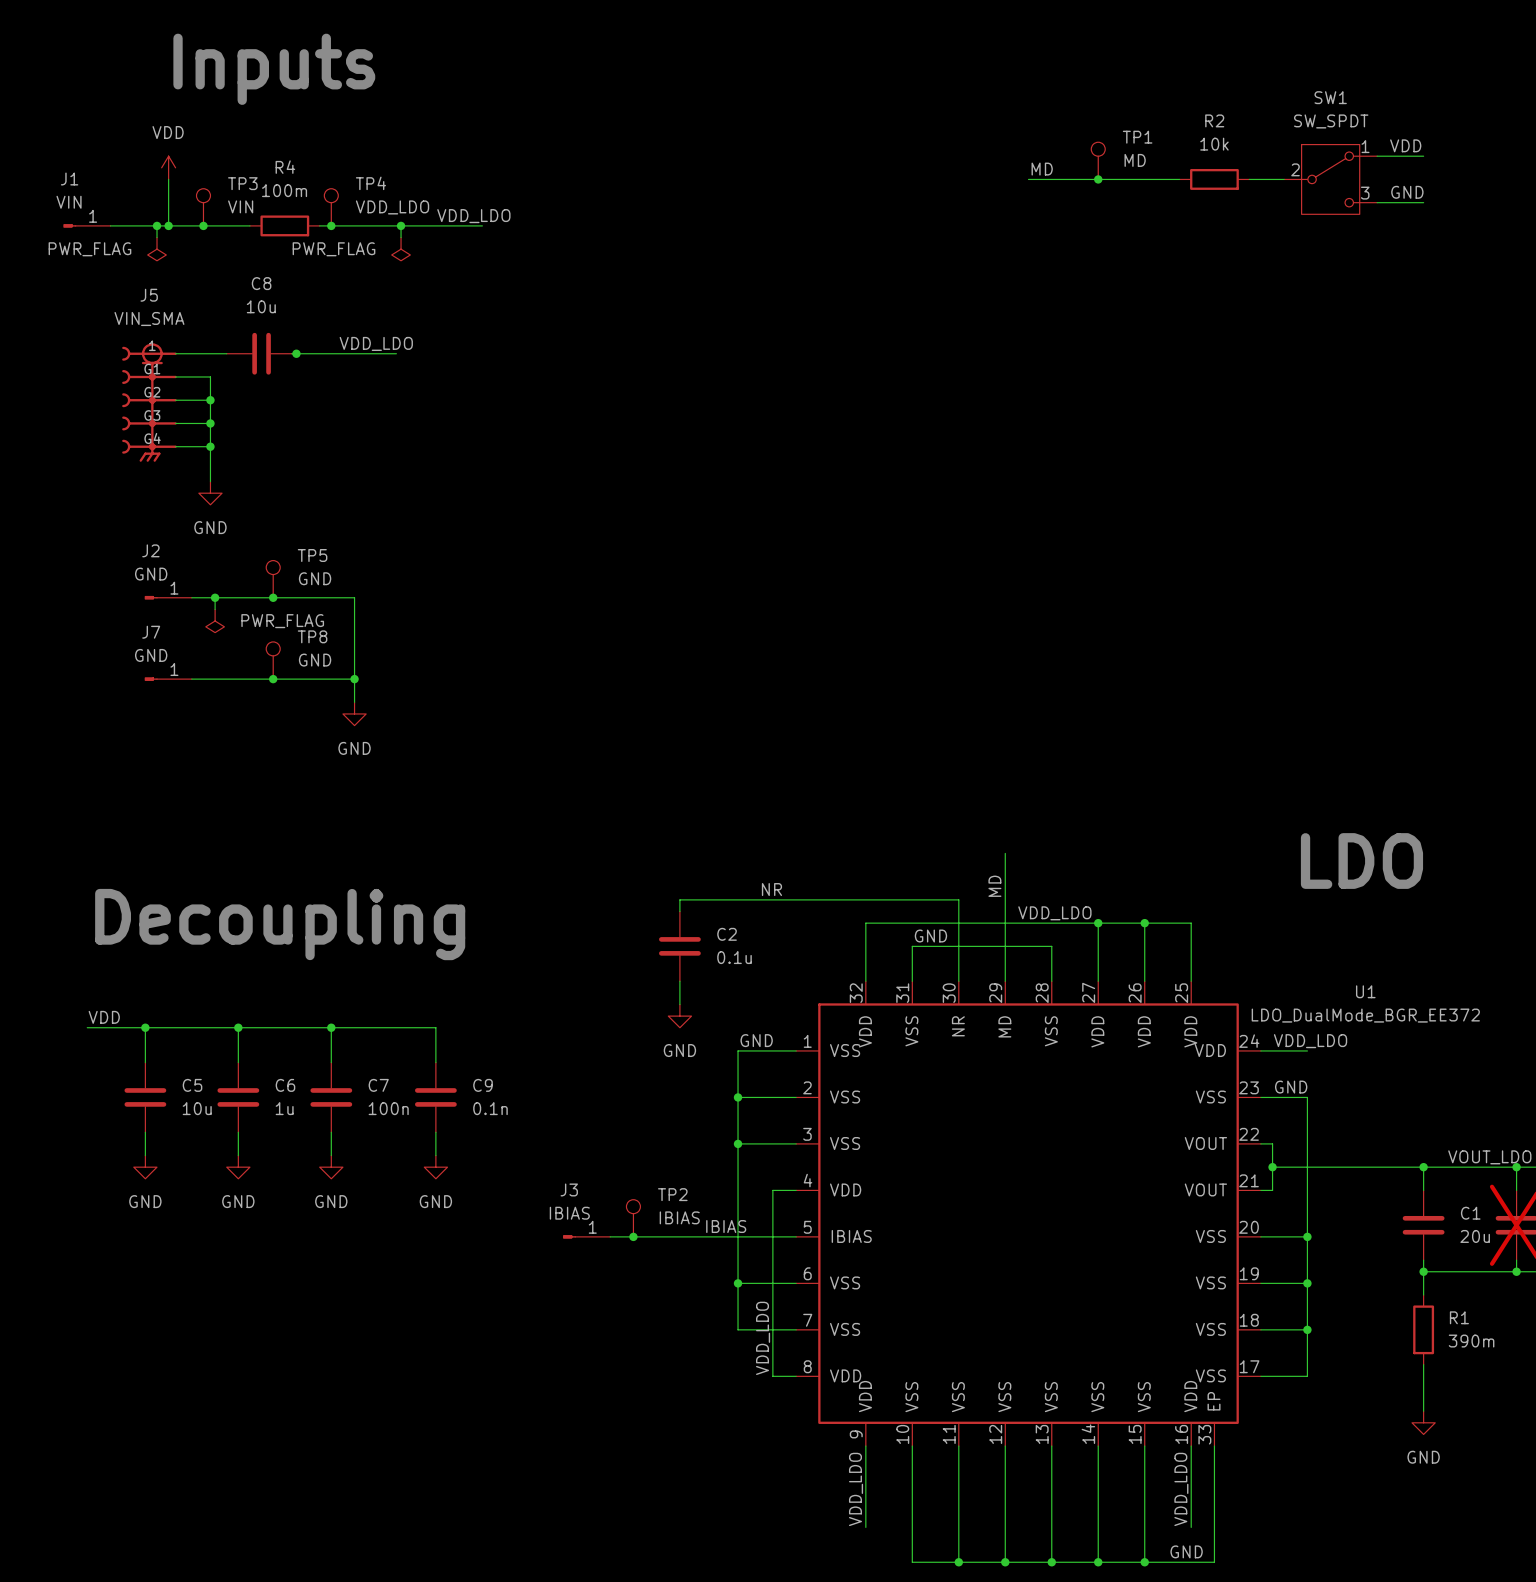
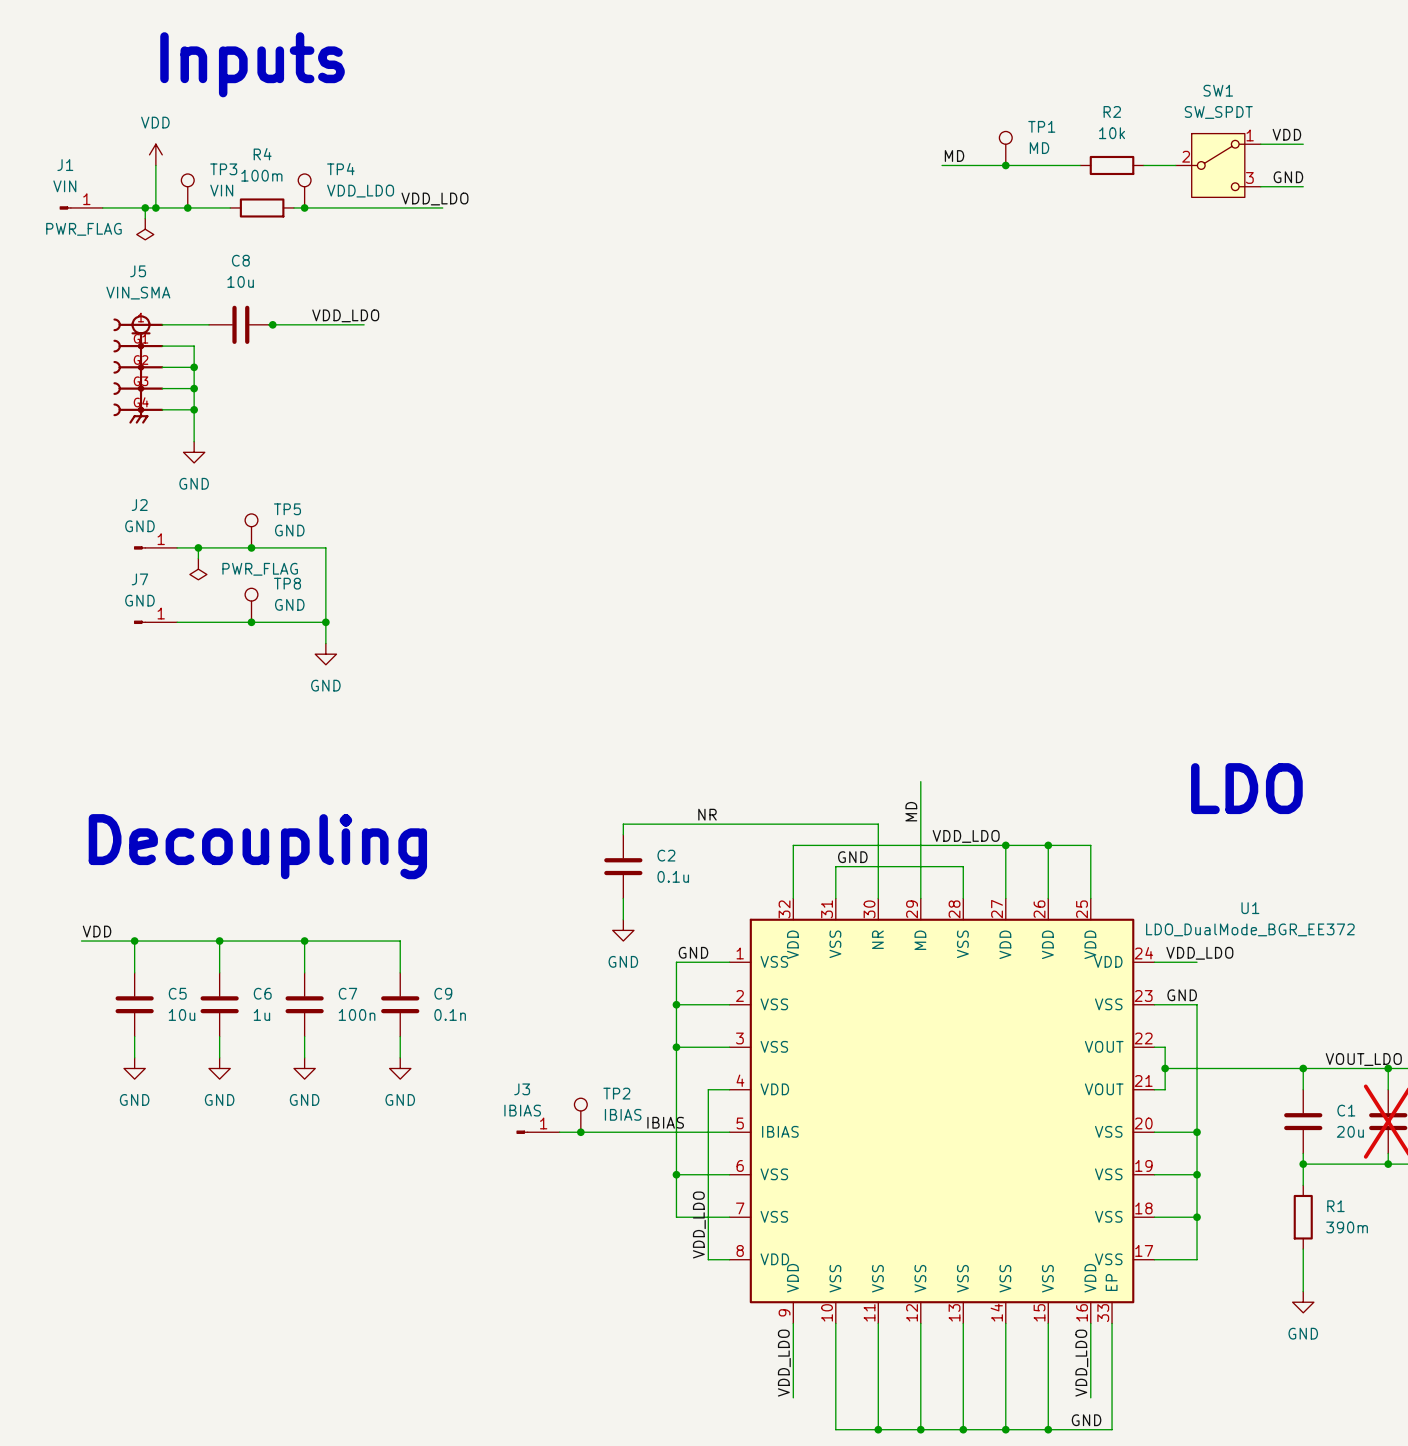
wire: (401, 225) (401, 237) -> none
junction: (401, 225) -> none
power symbol: PWR_FLAG (401, 249) -> none

